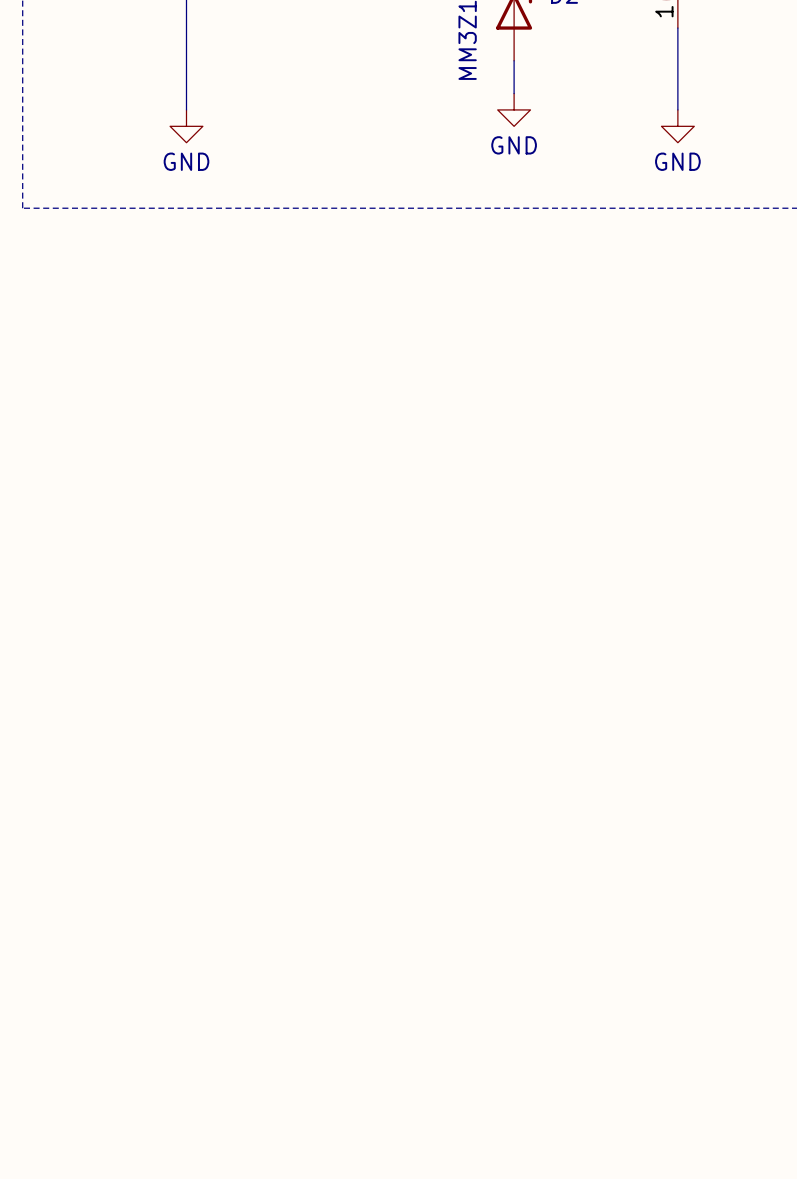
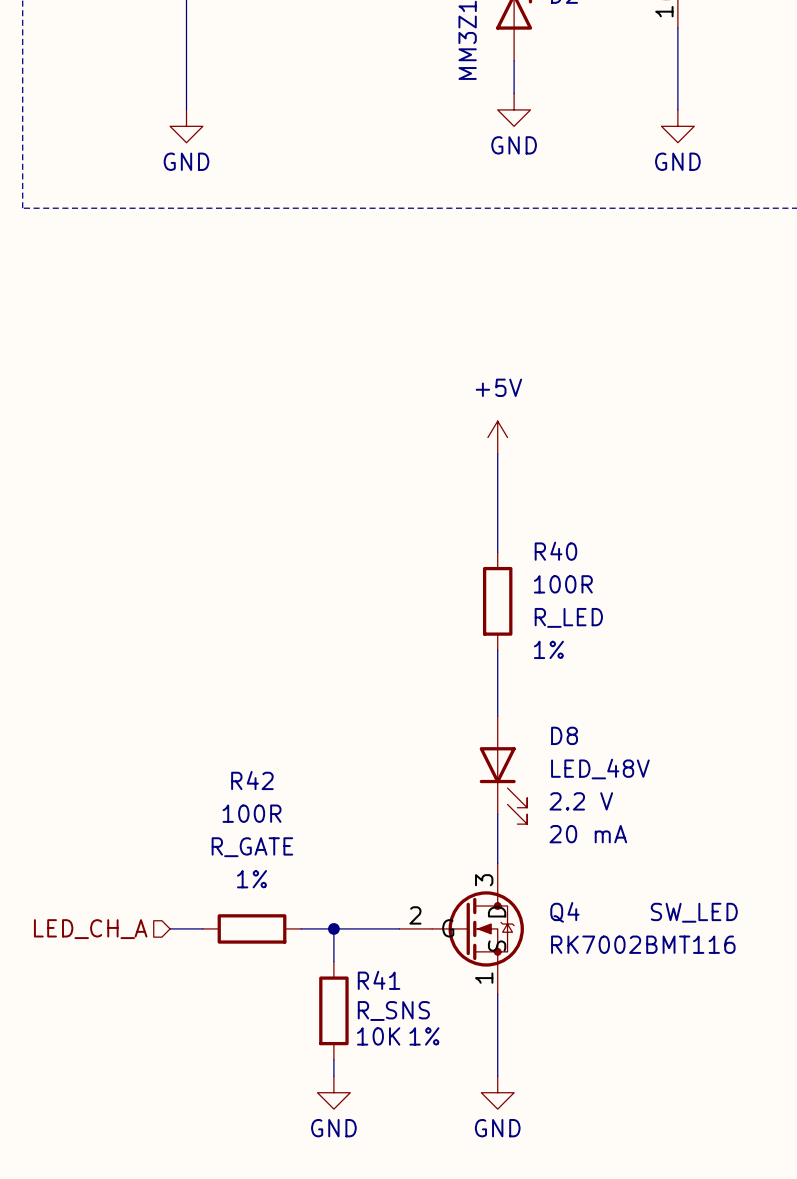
power symbol: none -> +5V (497, 437)
wire: none -> (497, 453) (497, 552)
R40: none -> 100R (497, 601)
wire: none -> (497, 650) (497, 716)
D8: none -> (503, 770)
wire: none -> (497, 814) (497, 863)
wire: none -> (170, 928) (202, 928)
R42: none -> 100R (252, 928)
wire: none -> (301, 928) (399, 928)
wire: none -> (333, 928) (333, 961)
junction: none -> (333, 928)
Q4: none -> RK7002BMT116 (461, 928)
hierarchical label: none -> LED_CH_A (90, 929)
wire: none -> (497, 994) (497, 1076)
R41: none -> 10K (333, 1010)
wire: none -> (333, 1059) (333, 1076)
power symbol: none -> GND (333, 1092)
power symbol: none -> GND (497, 1092)

